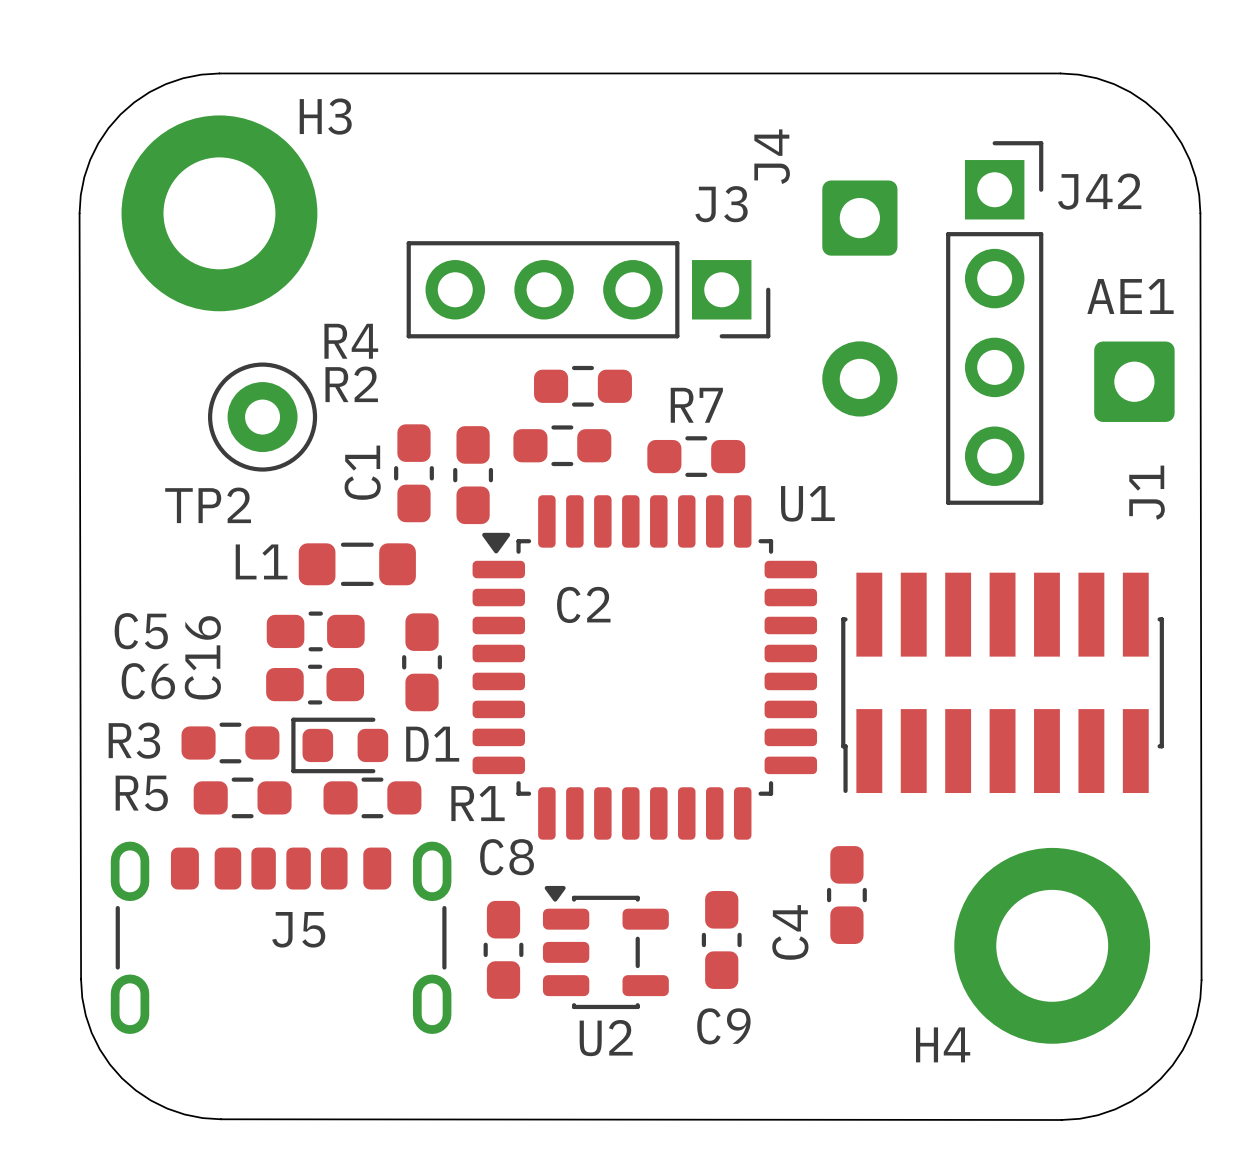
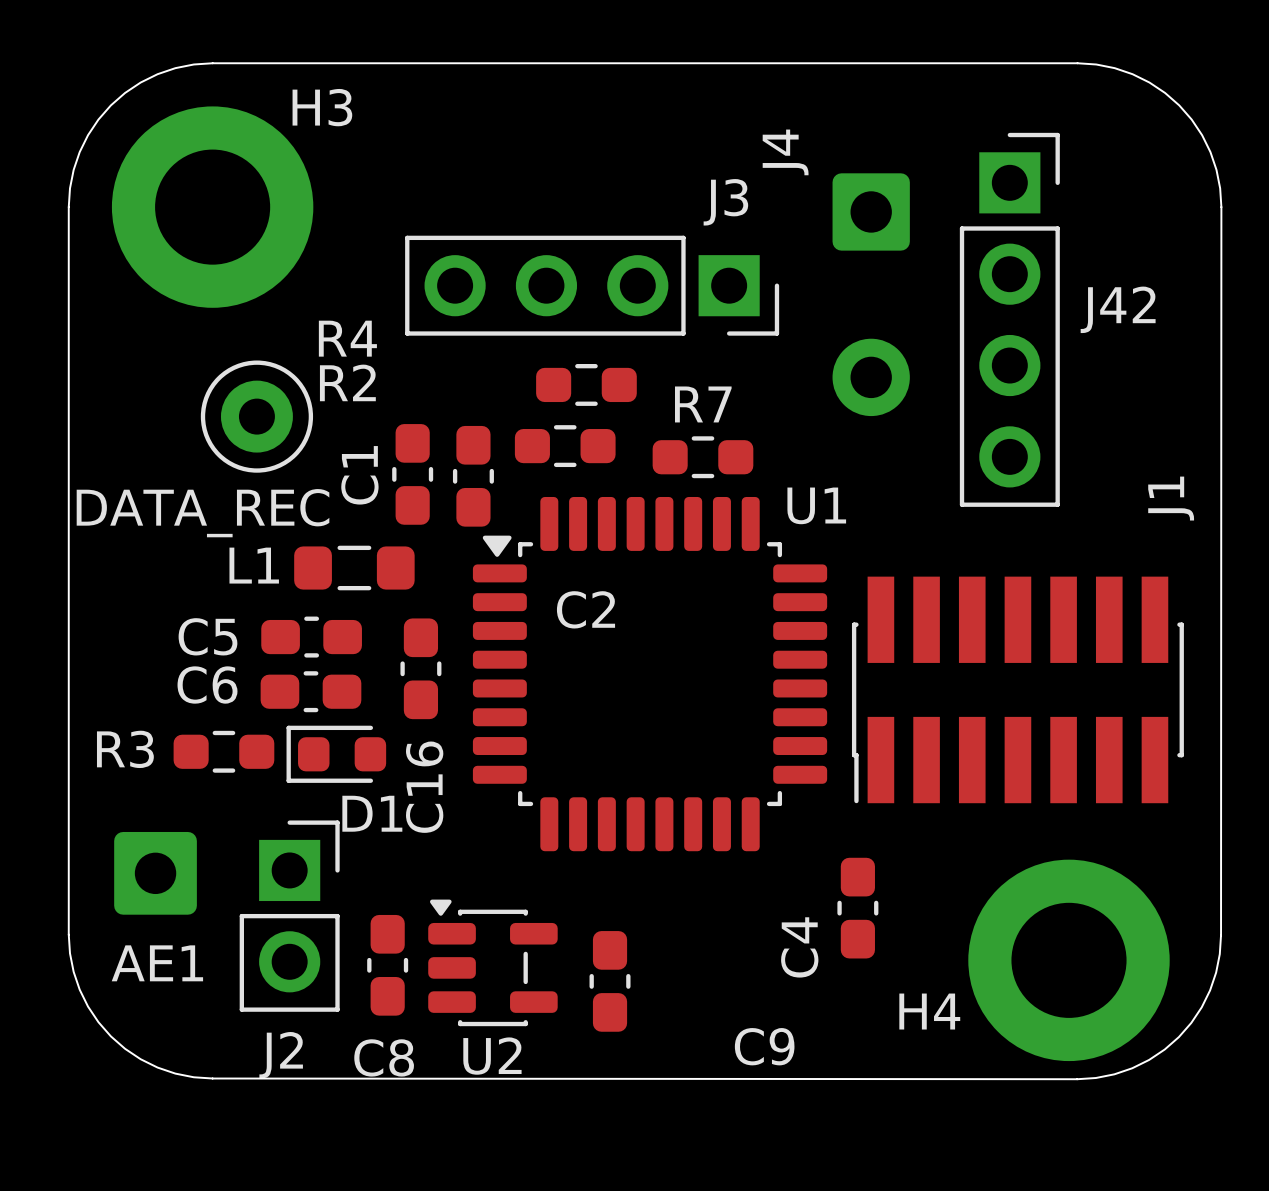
J42 name position: J42 (1099, 191) -> J42 (1118, 309)
board edge: (79, 213) (81, 979) (85, 1015) (91, 1032) (99, 1049) (122, 1078) (135, 1090) (167, 1108) (184, 1114) (220, 1119) (1061, 1119) (1097, 1115) (1131, 1101) (1146, 1091) (1160, 1079) (1182, 1050) (1196, 1016) (1200, 998) (1200, 213) -> (68, 207) (70, 953) (73, 971) (88, 1006) (98, 1022) (125, 1048) (140, 1059) (175, 1073) (212, 1078) (1077, 1079) (1095, 1077) (1132, 1068) (1164, 1049) (1178, 1037) (1201, 1007) (1216, 972) (1219, 954) (1221, 207)
AE1 name position: AE1 (1130, 296) -> AE1 (157, 963)
AE1 position: (1134, 381) -> (155, 873)
TP2 name: TP2 (208, 505) -> DATA_REC (203, 513)
C5 name position: C5 (141, 631) -> C5 (207, 636)
C16 name position: C16 (202, 657) -> C16 (424, 787)
C6 name position: C6 (148, 681) -> C6 (207, 685)
D1 name position: D1 (432, 744) -> D1 (372, 813)
R5: (242, 797) -> none
R1: (372, 797) -> none
C8 name position: C8 (507, 857) -> C8 (384, 1057)
J2: none -> (289, 916)
J5: (281, 937) -> none
C9 position: (721, 939) -> (610, 981)
U2 position: (605, 947) -> (492, 962)
C8 position: (503, 949) -> (387, 965)
C9 name position: C9 (723, 1026) -> C9 (764, 1046)
H4 name position: H4 (943, 1044) -> H4 (929, 1011)

